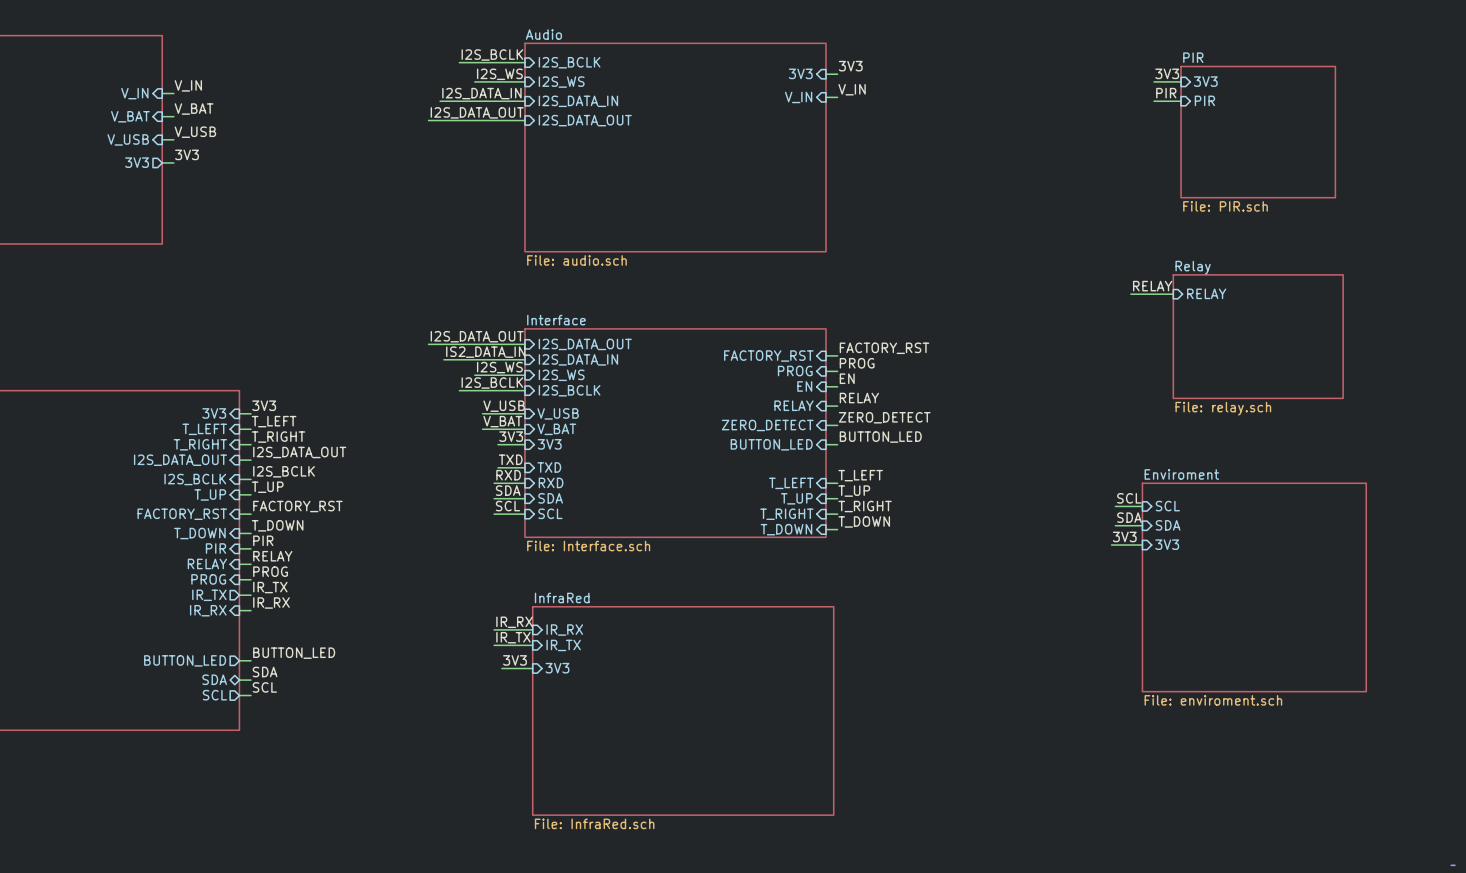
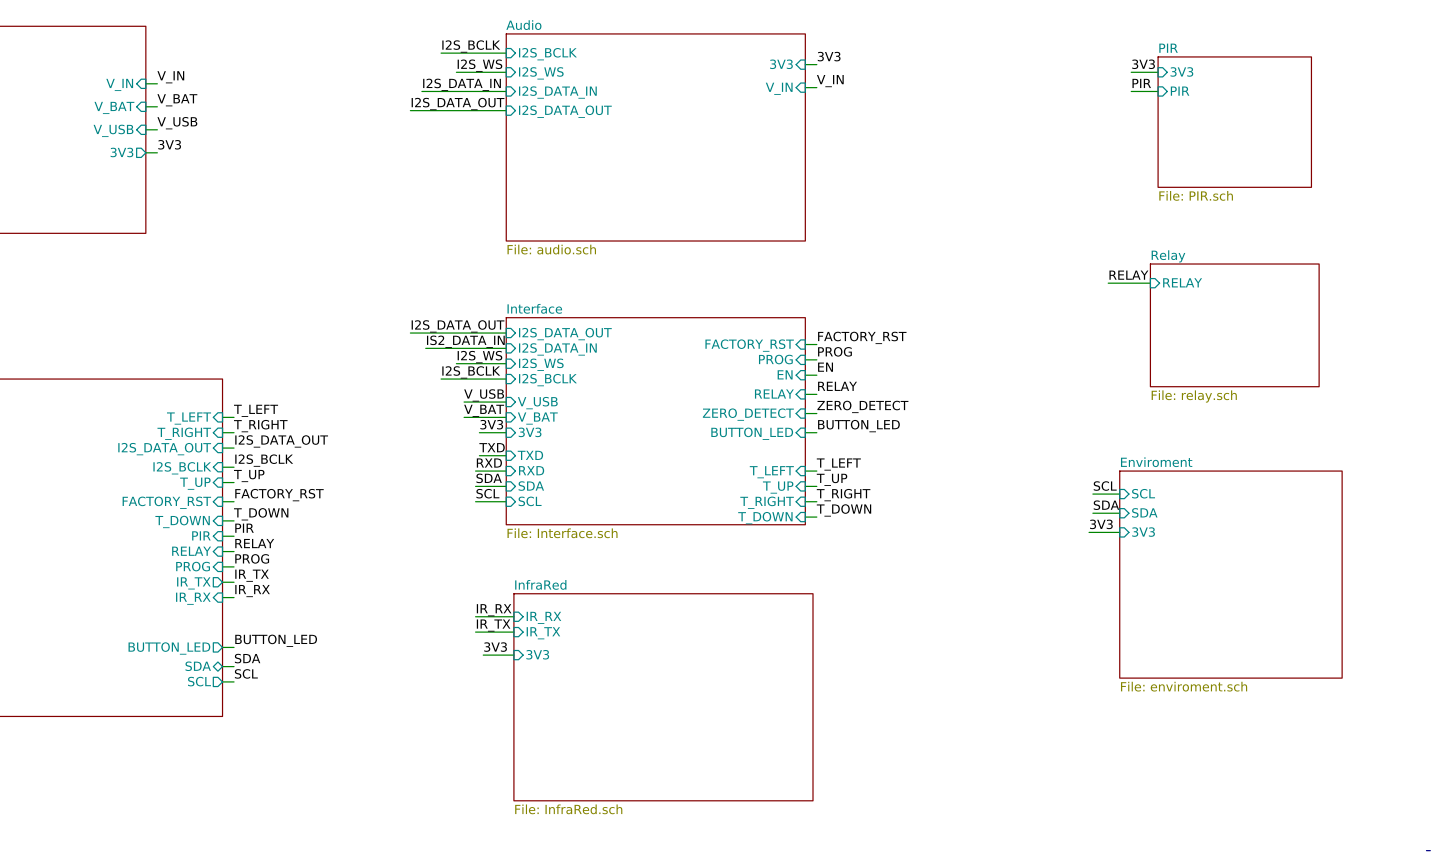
label: 3V3 (264, 405) -> none
sheet pin: 3V3 (214, 413) -> none
wire: (239, 413) (251, 413) -> none

